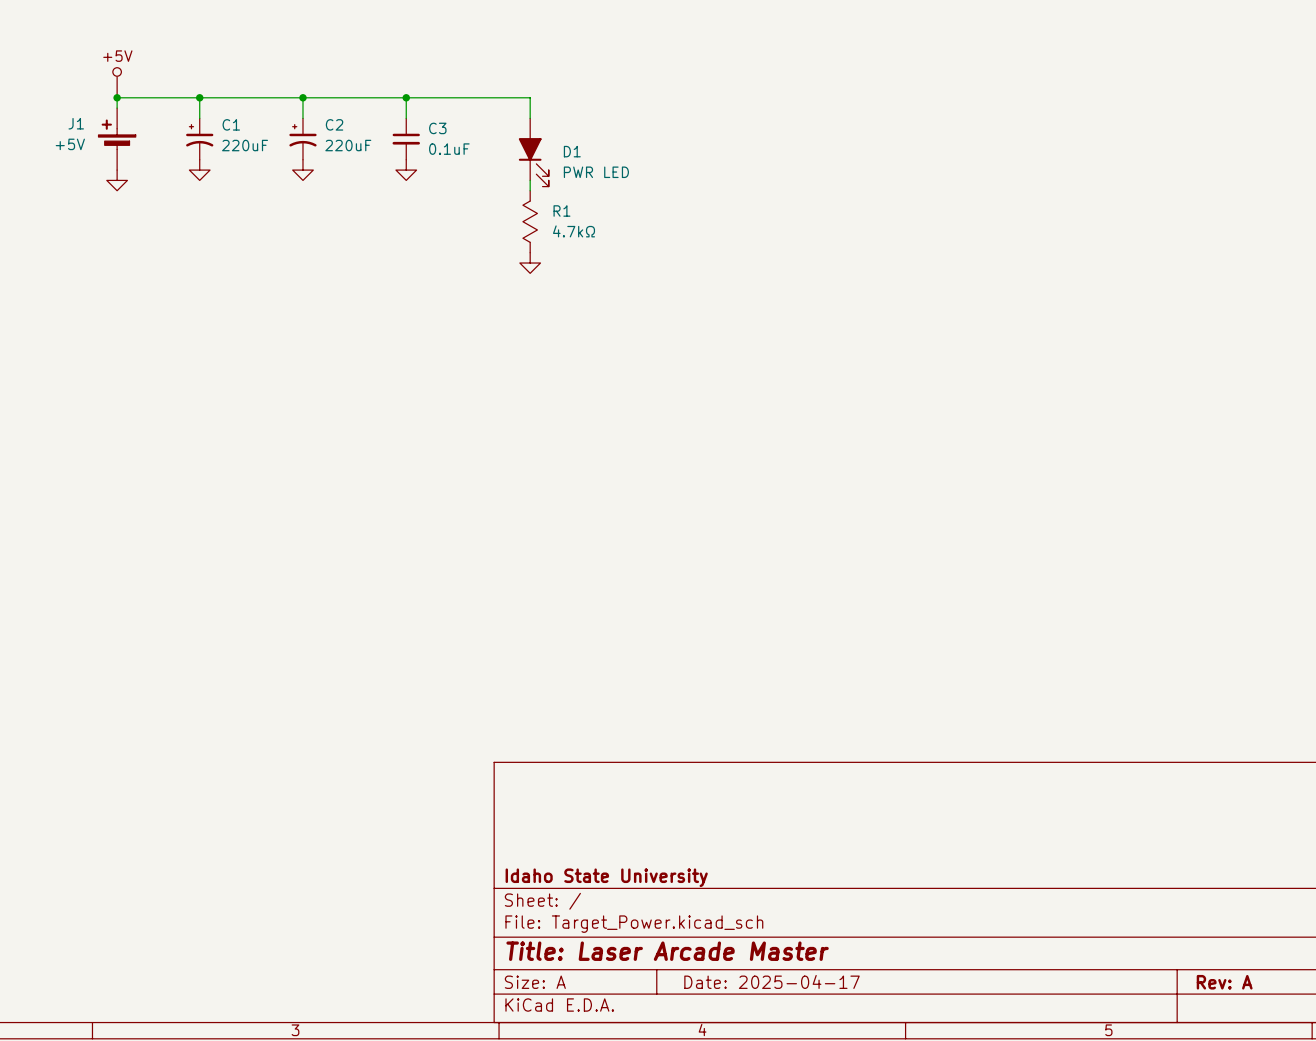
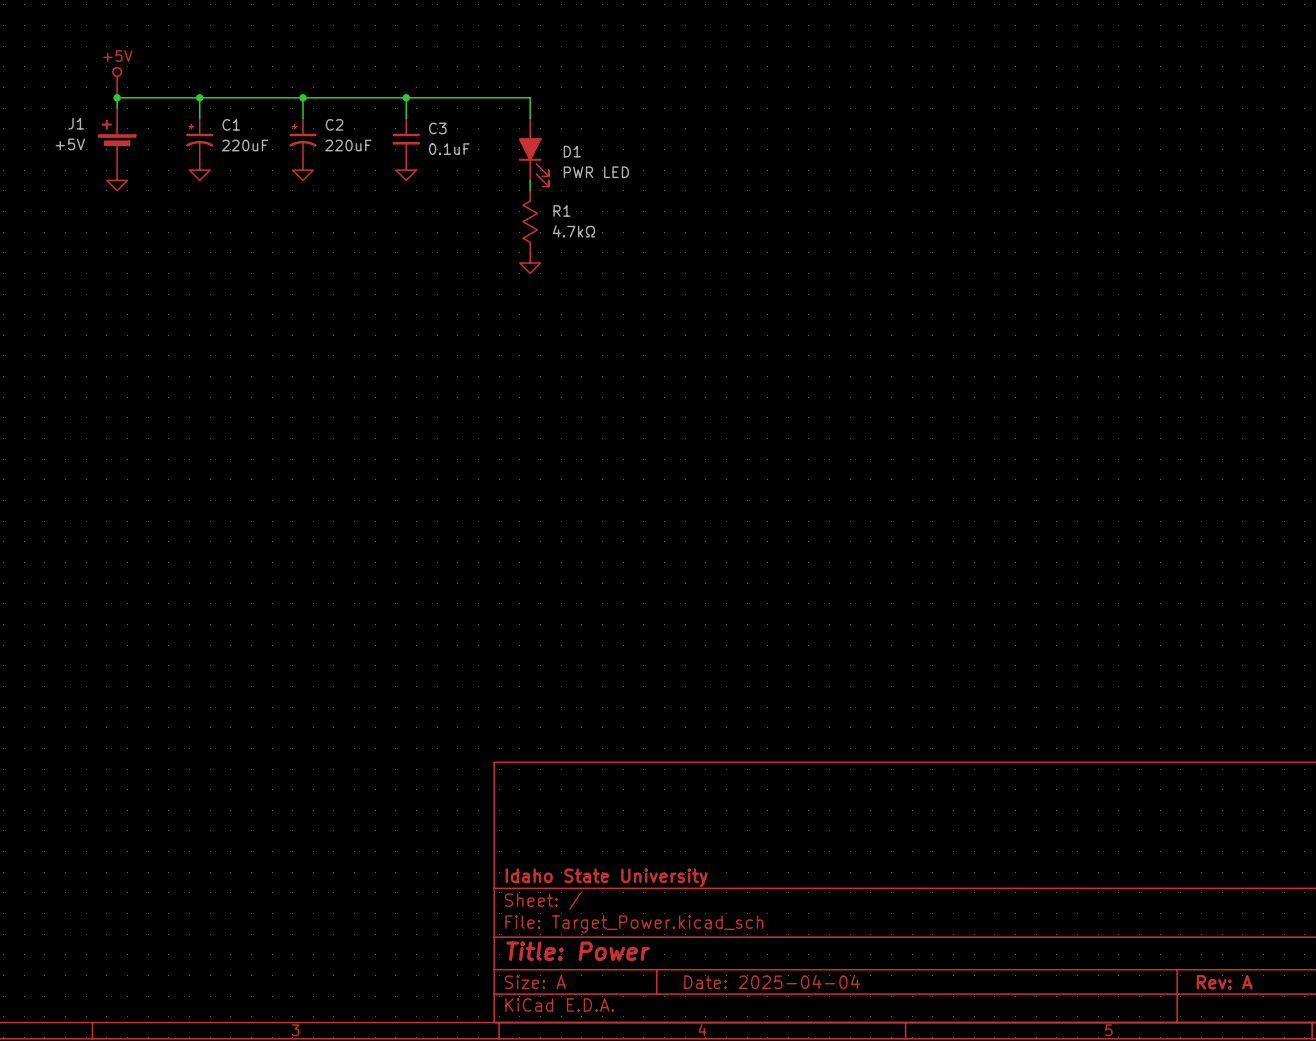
title block: Title: Laser Arcade Master (667, 951) -> Title: Power (578, 951)
title block: Date: 2025-04-17 (772, 981) -> Date: 2025-04-04 (772, 981)

